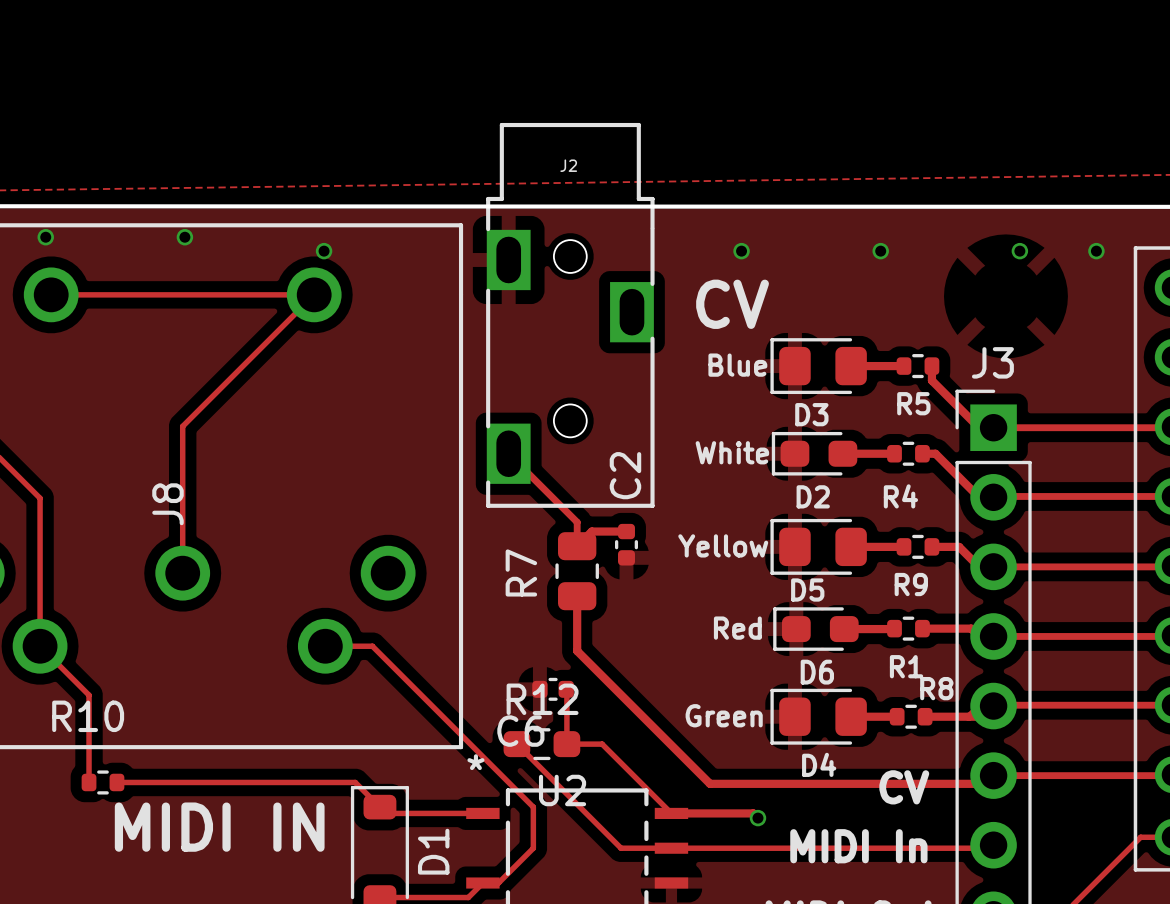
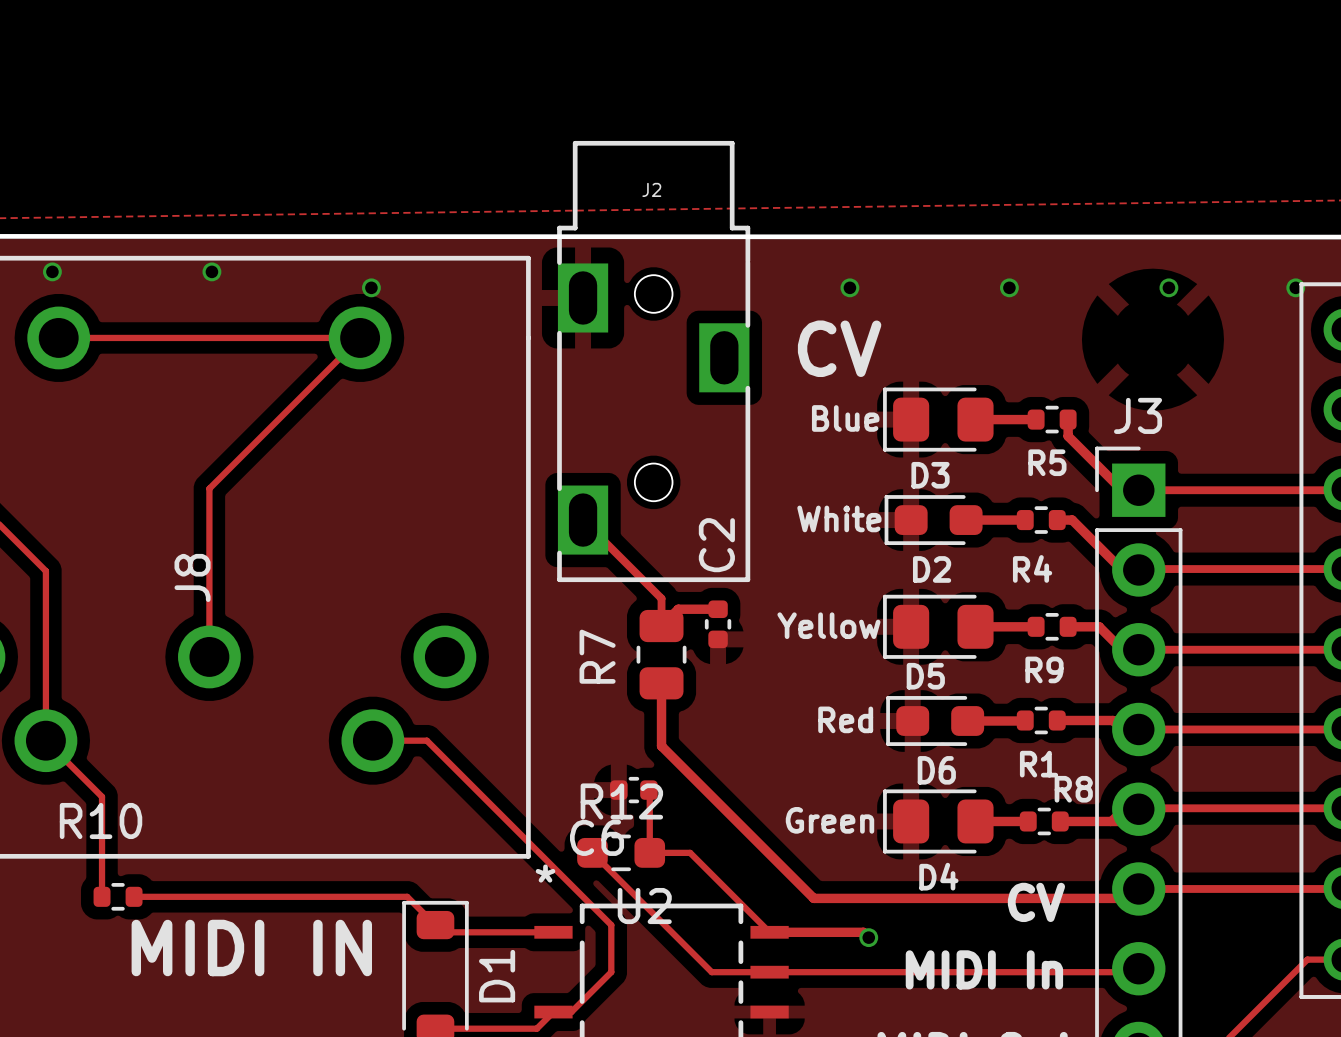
via position: (1096, 251) -> (1295, 287)

